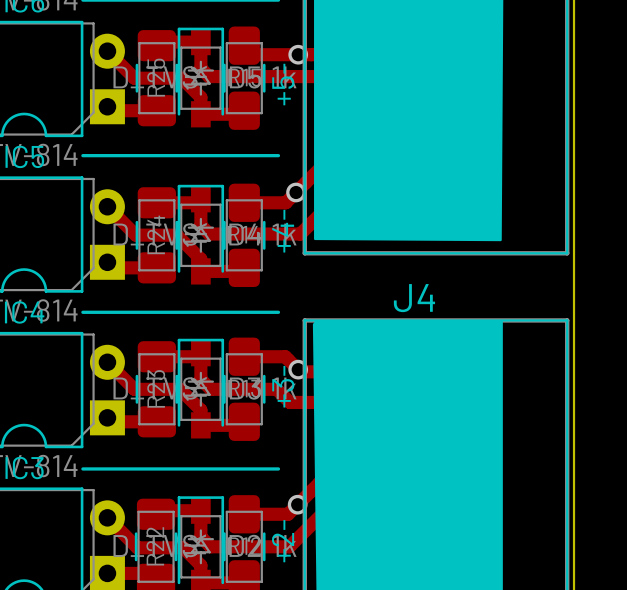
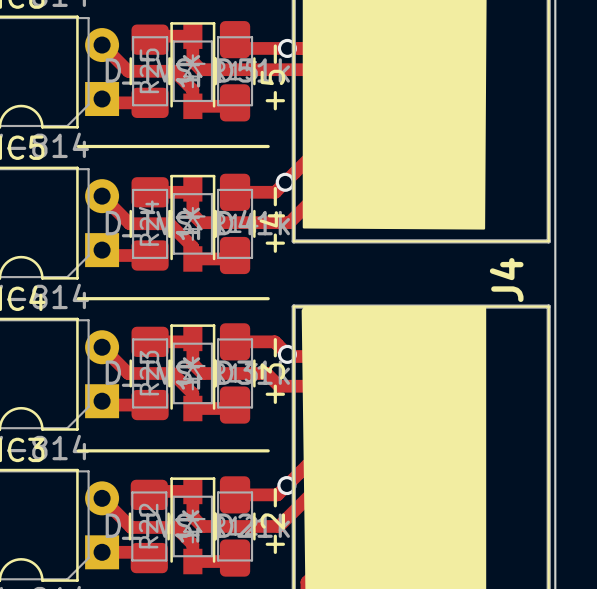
J4 name rotation: 0° (414, 298) -> 90° counterclockwise (506, 280)
J4 name position: J4 (414, 298) -> J4 (506, 280)

